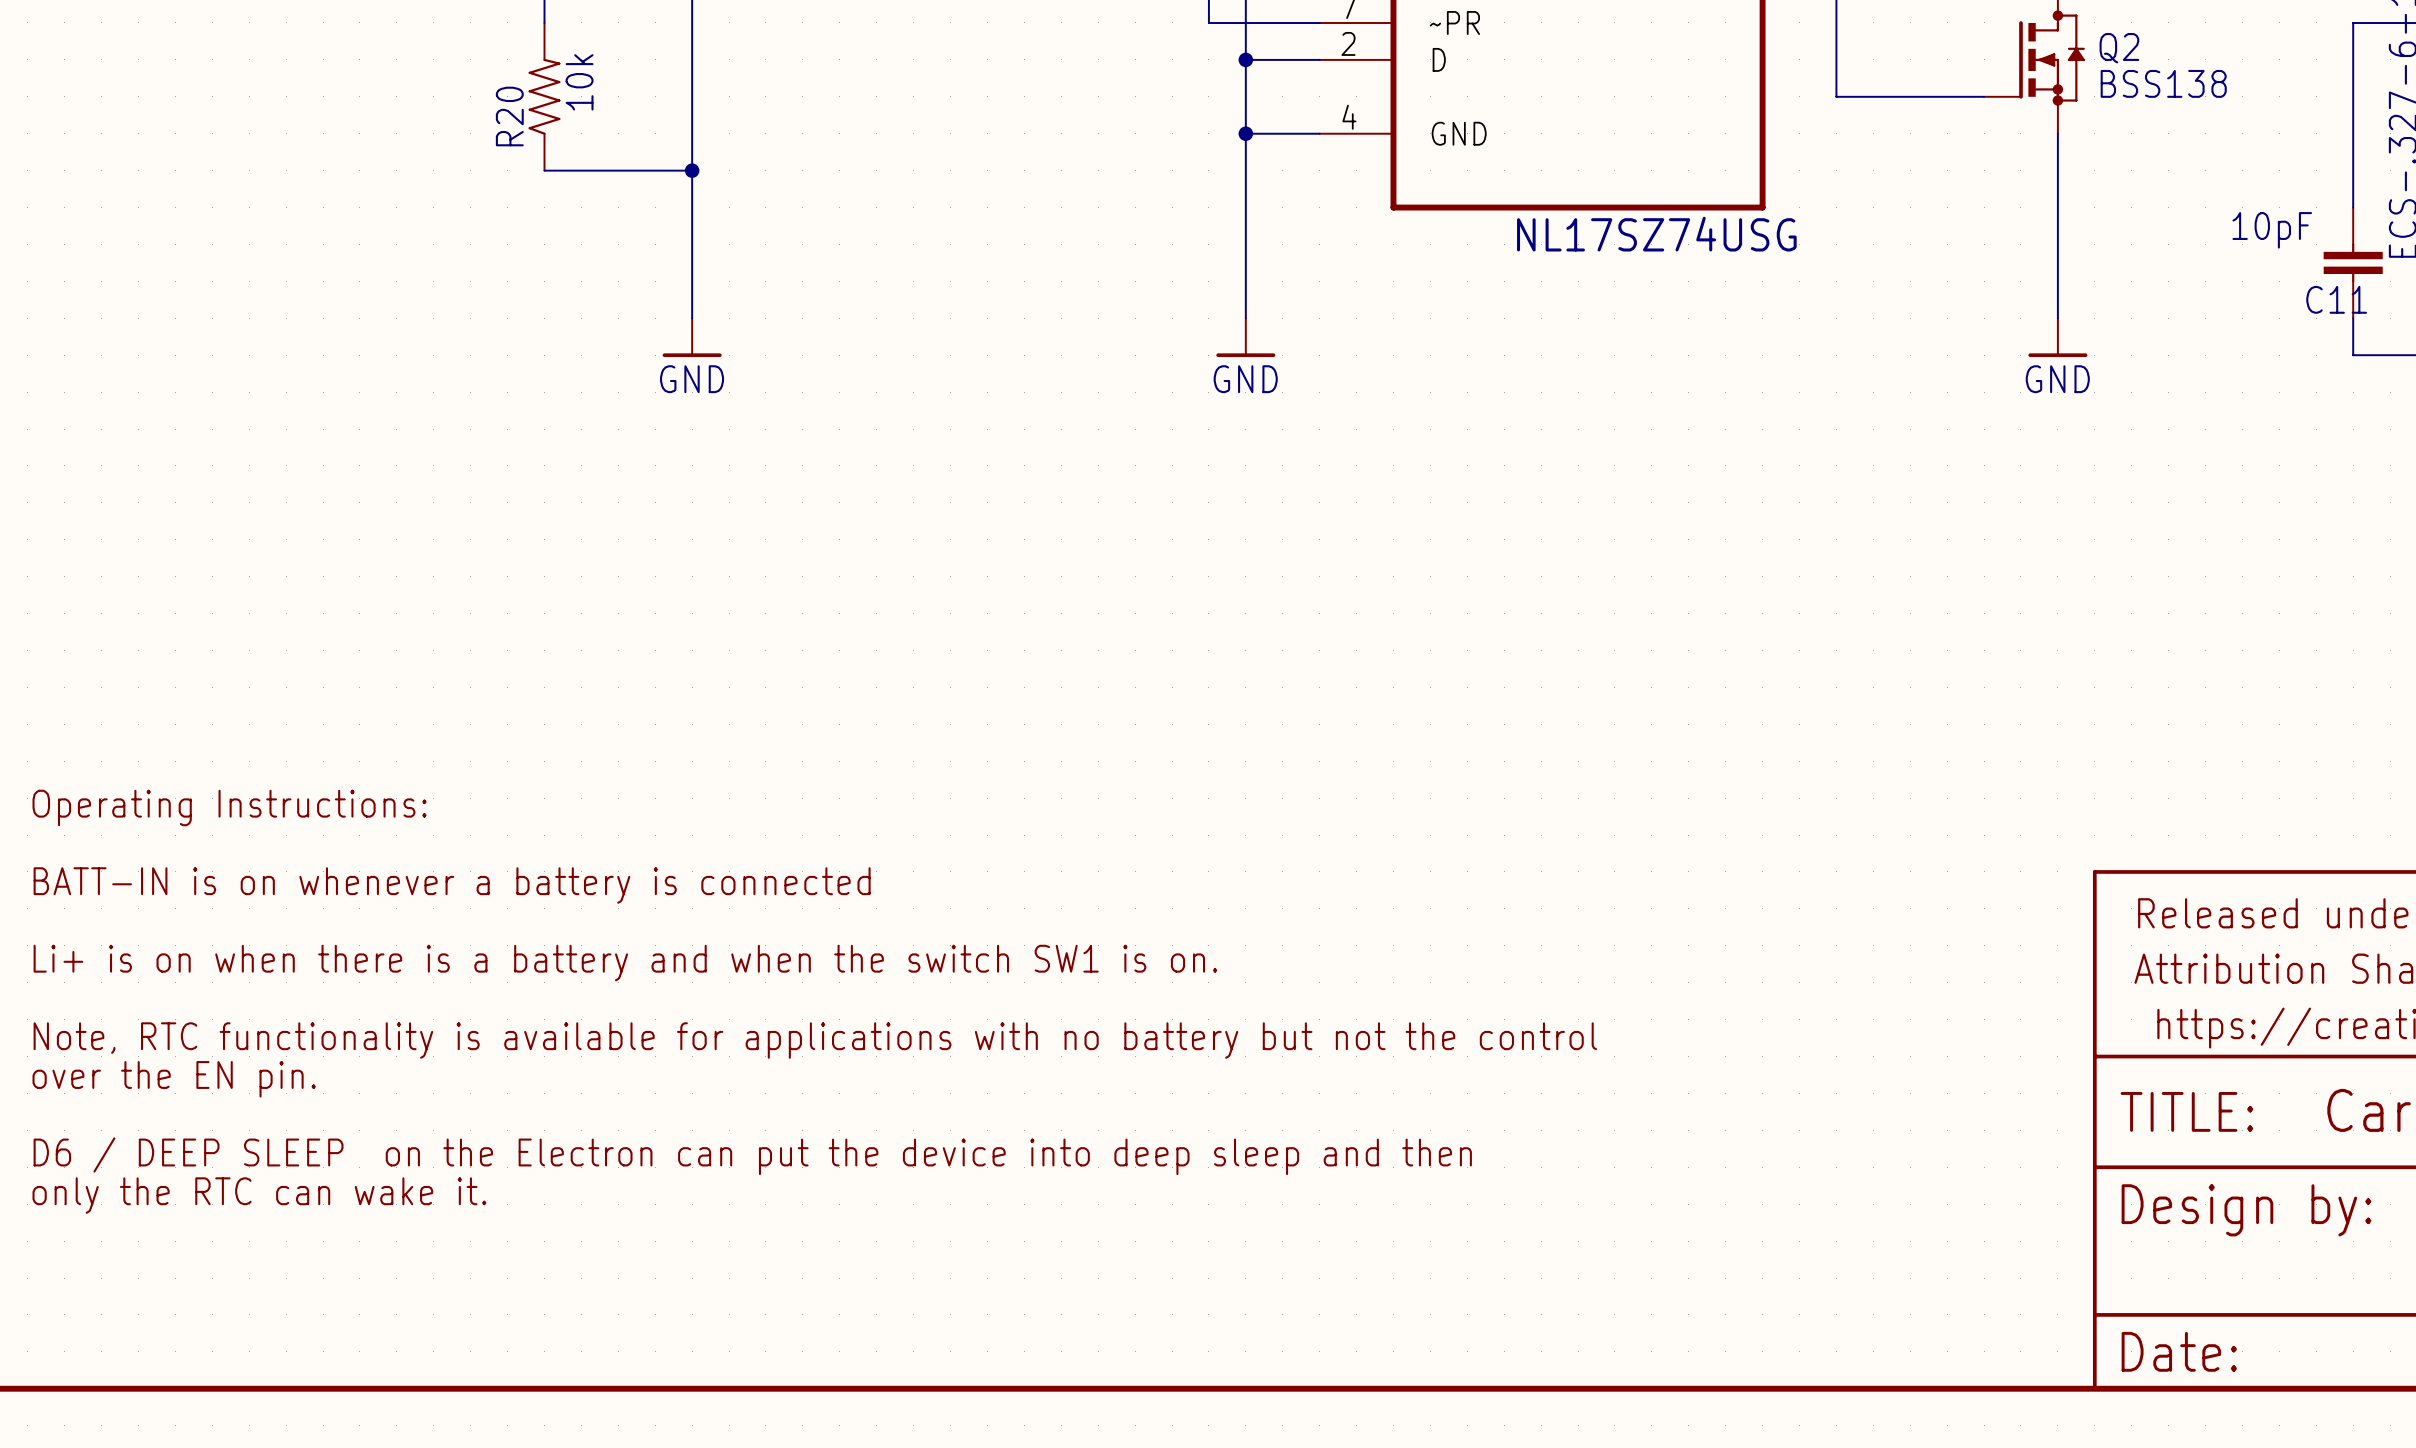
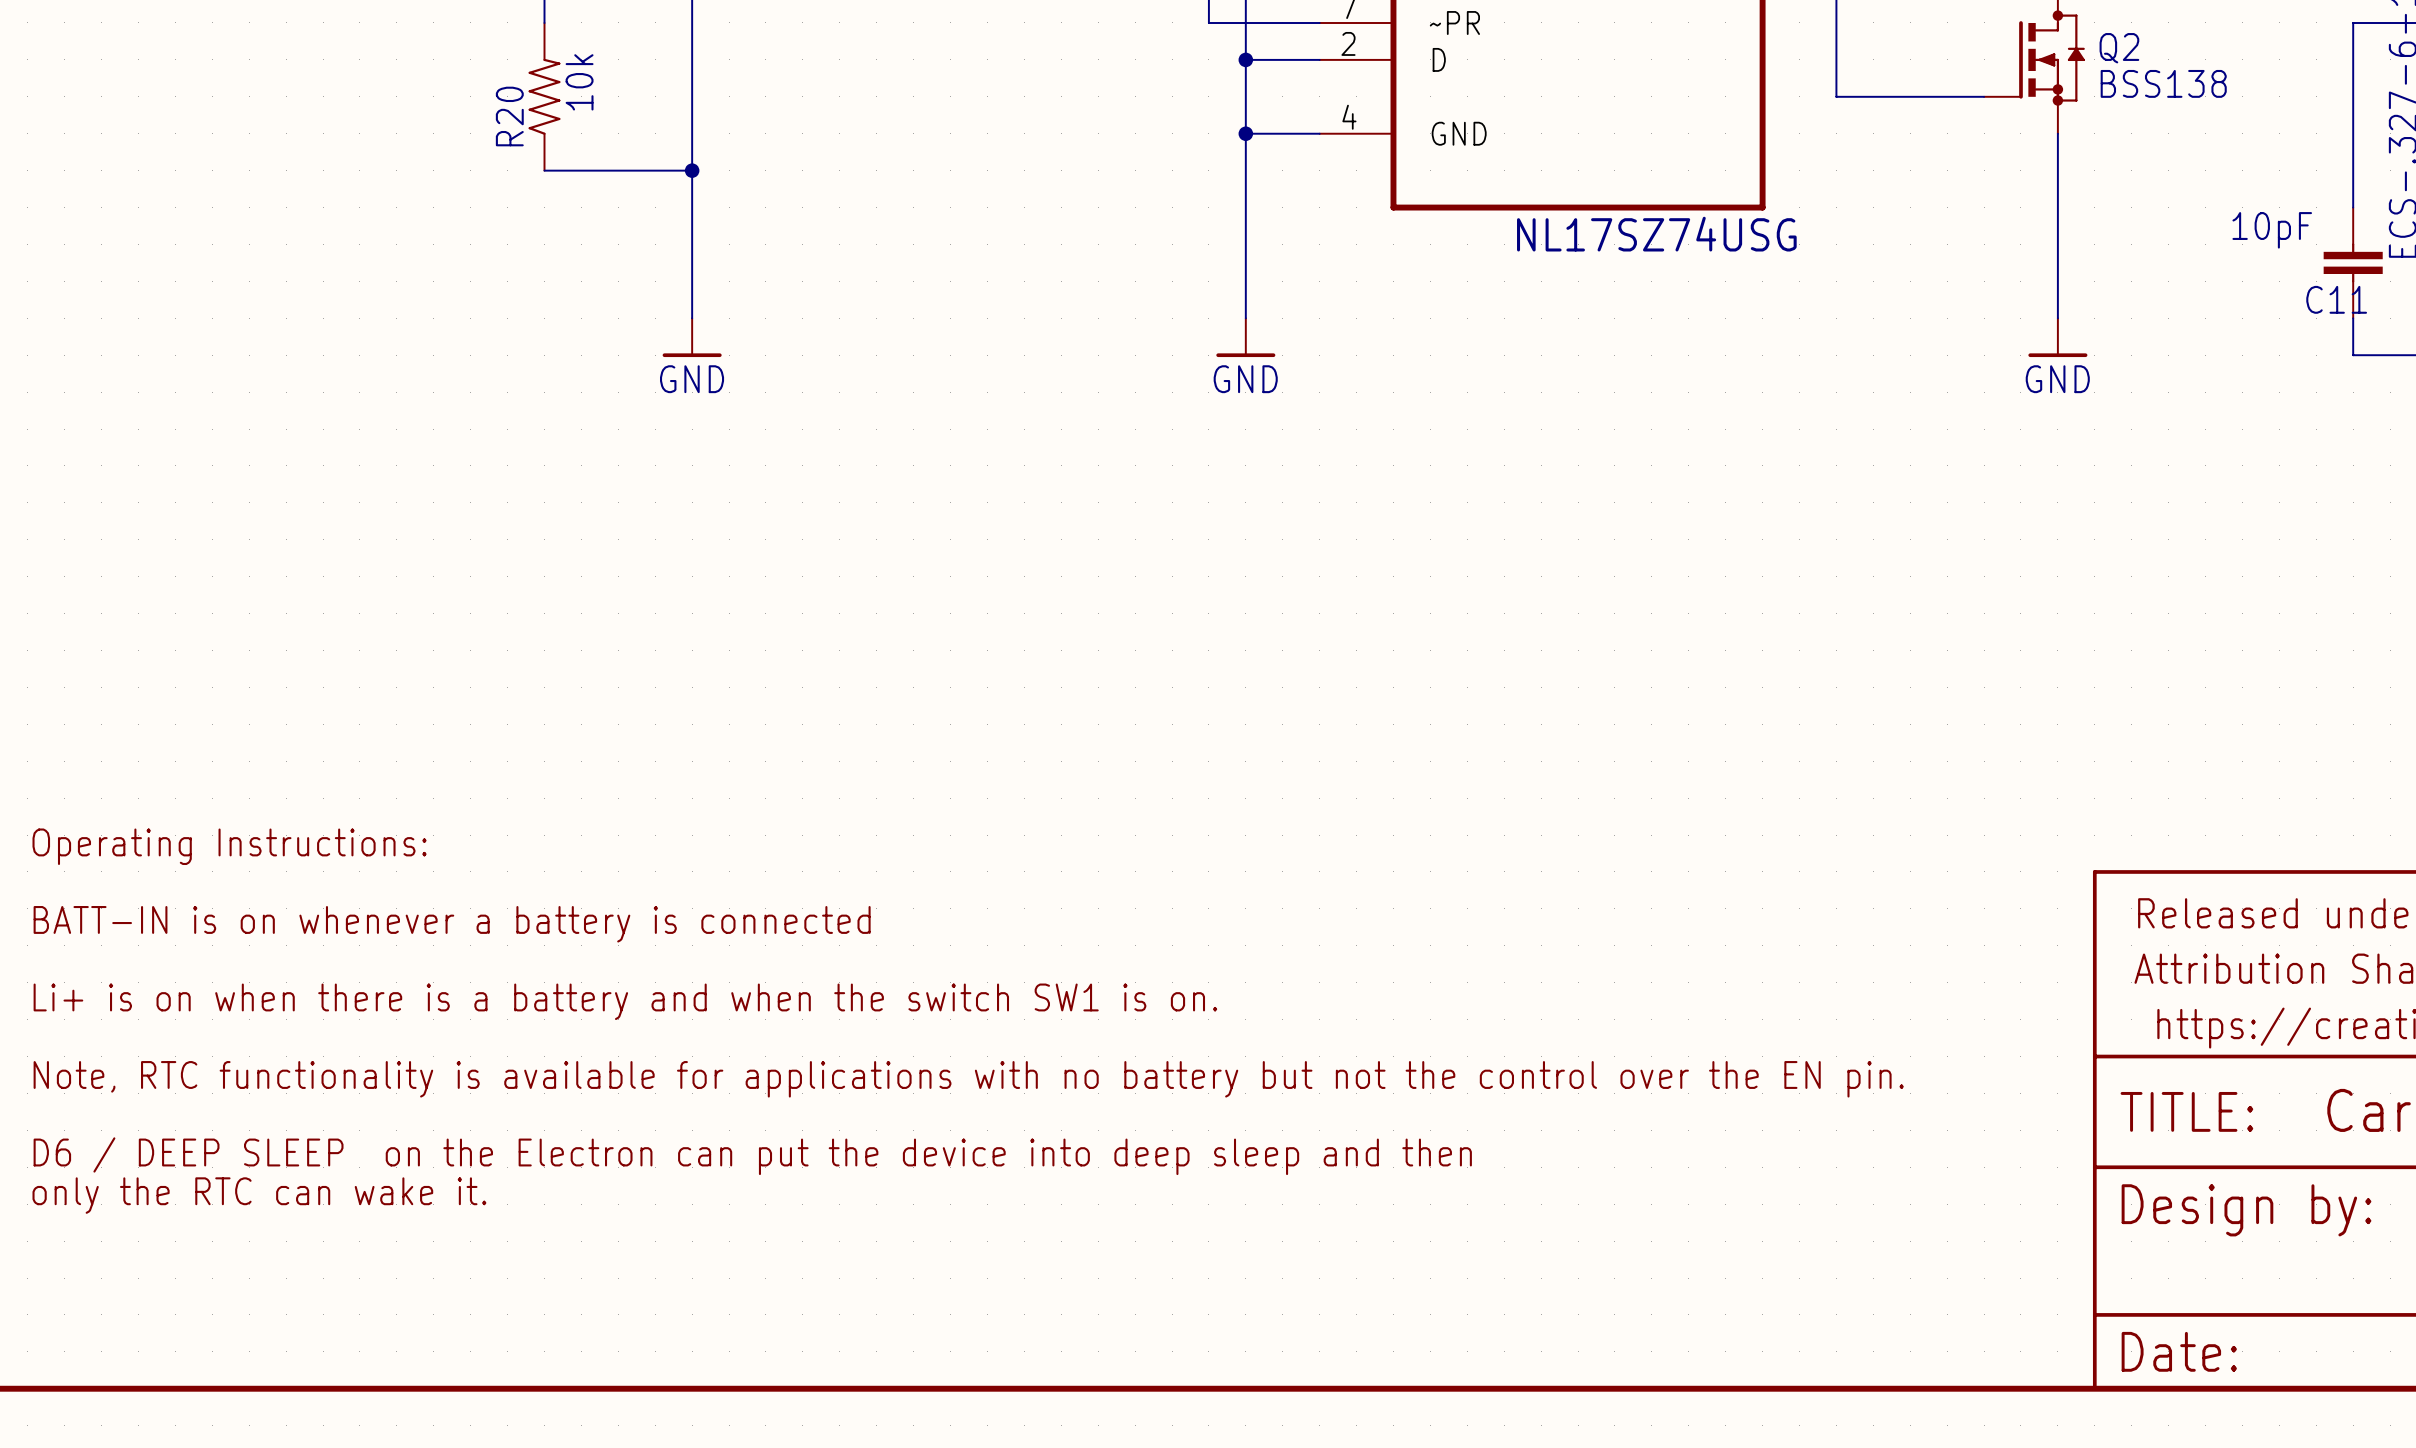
text position: Operating Instructions: (229, 807) -> Operating Instructions: (229, 846)
text position: BATT-IN is on whenever a battery is connected (452, 885) -> BATT-IN is on whenever a battery is connected (452, 924)
text position: Li+ is on when there is a battery and when the switch SW1 is on. (625, 963) -> Li+ is on when there is a battery and when the switch SW1 is on. (625, 1001)
text: Note, RTC functionality is available for applications with no battery but not the control (815, 1040) -> none
text: over the EN pin. (174, 1079) -> Note, RTC functionality is available for applications with no battery but not the control over the EN pin. (968, 1079)

